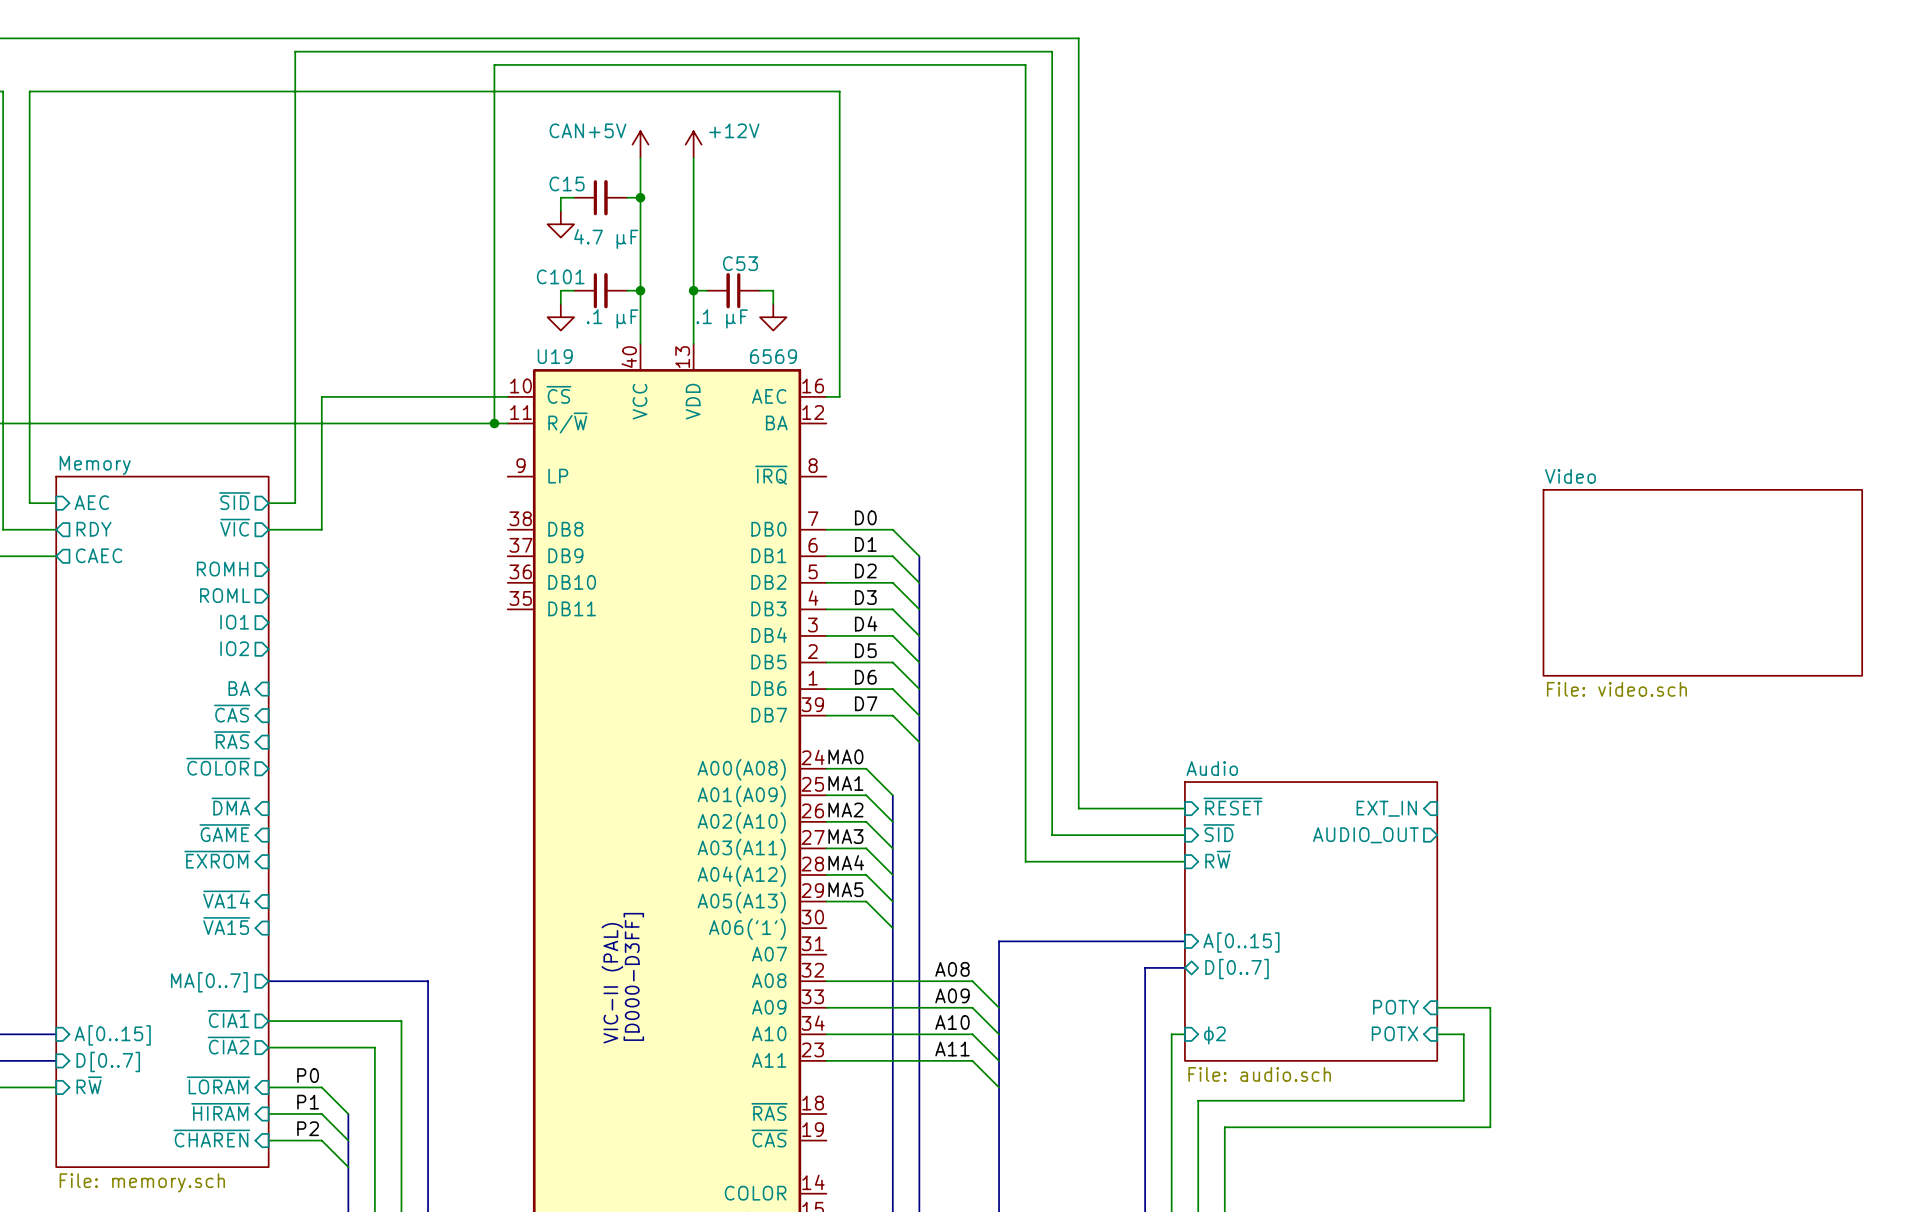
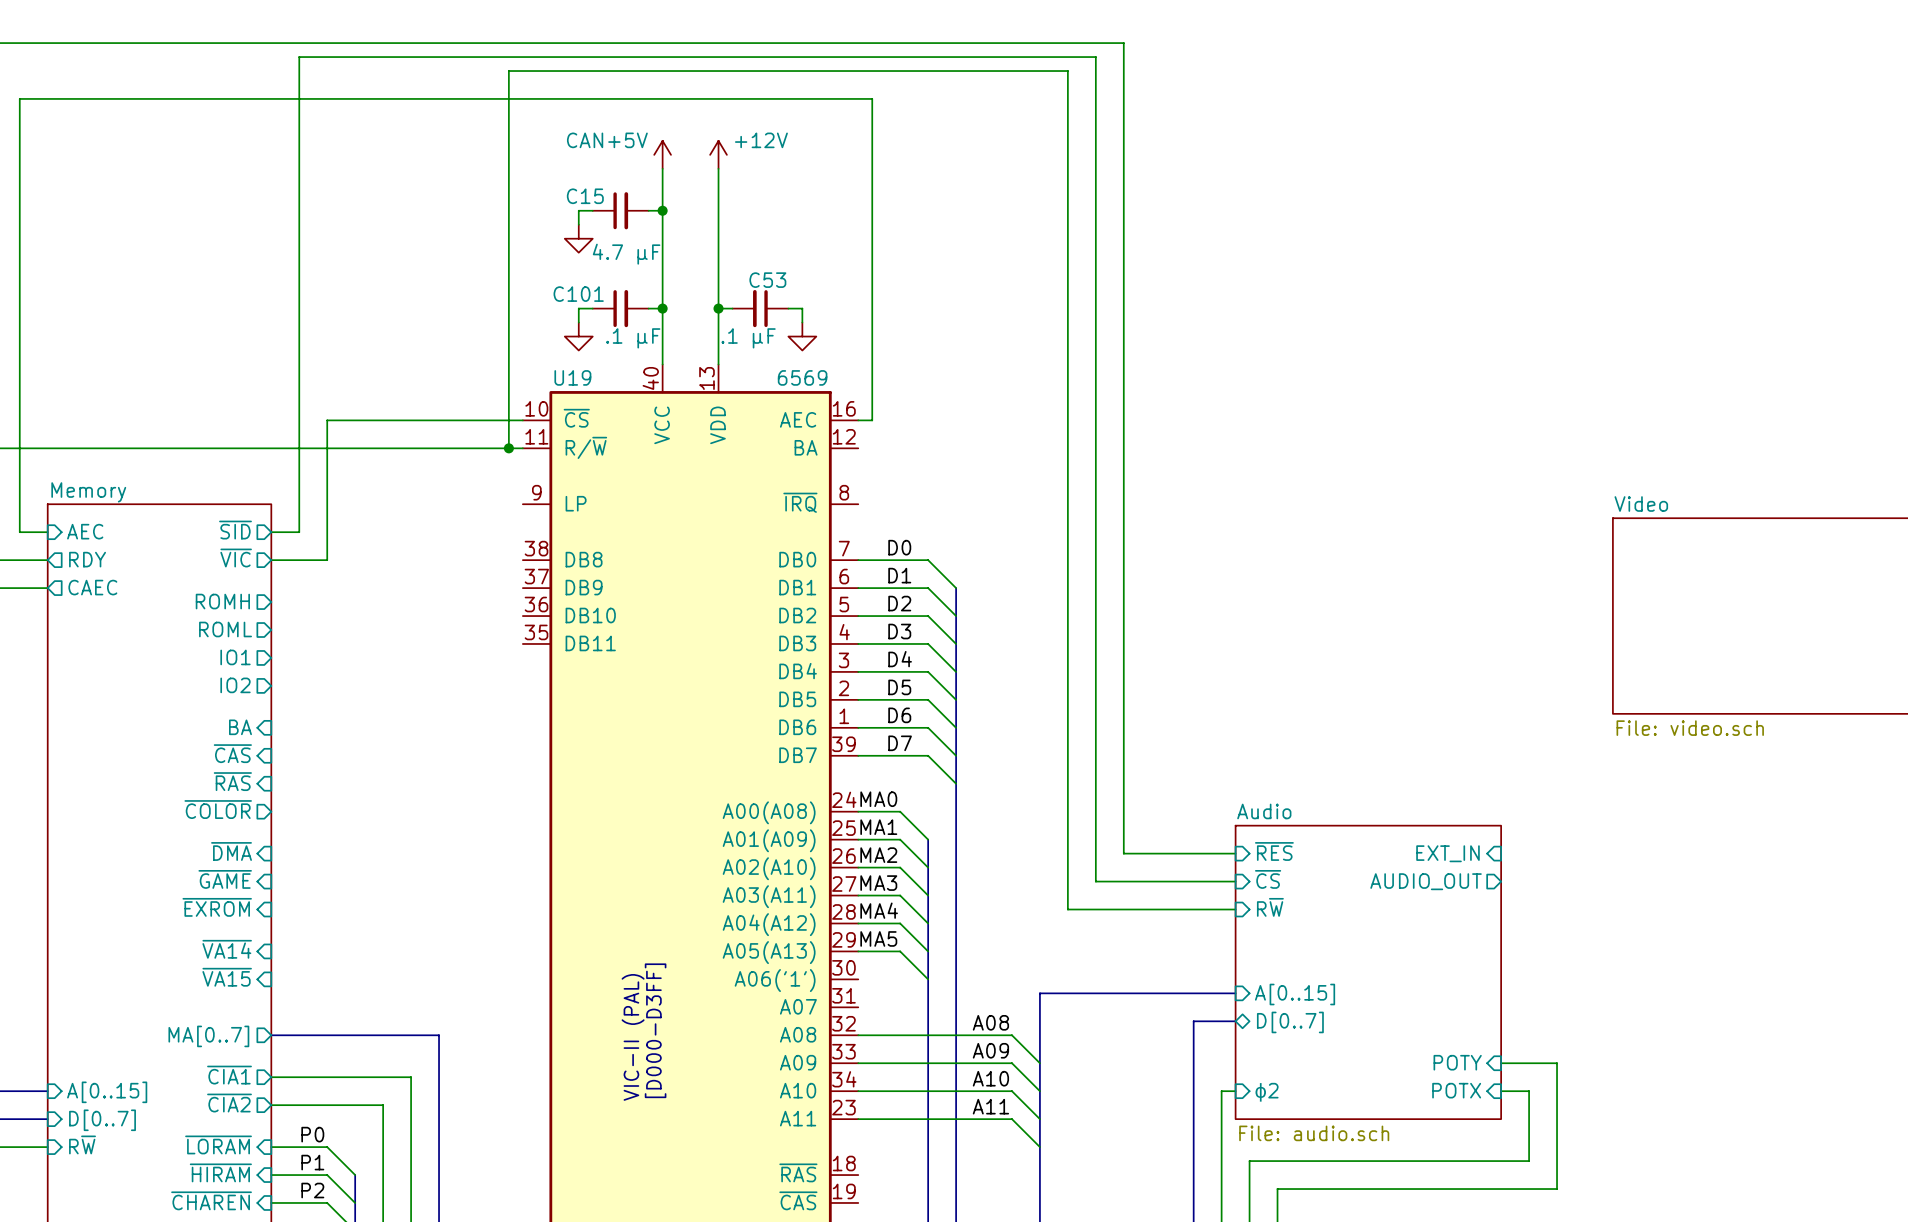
sheet pin: ~{RESET} (1232, 806) -> ~{RES} (1274, 851)
sheet pin: ~{SID} (1218, 833) -> ~{CS} (1268, 879)

